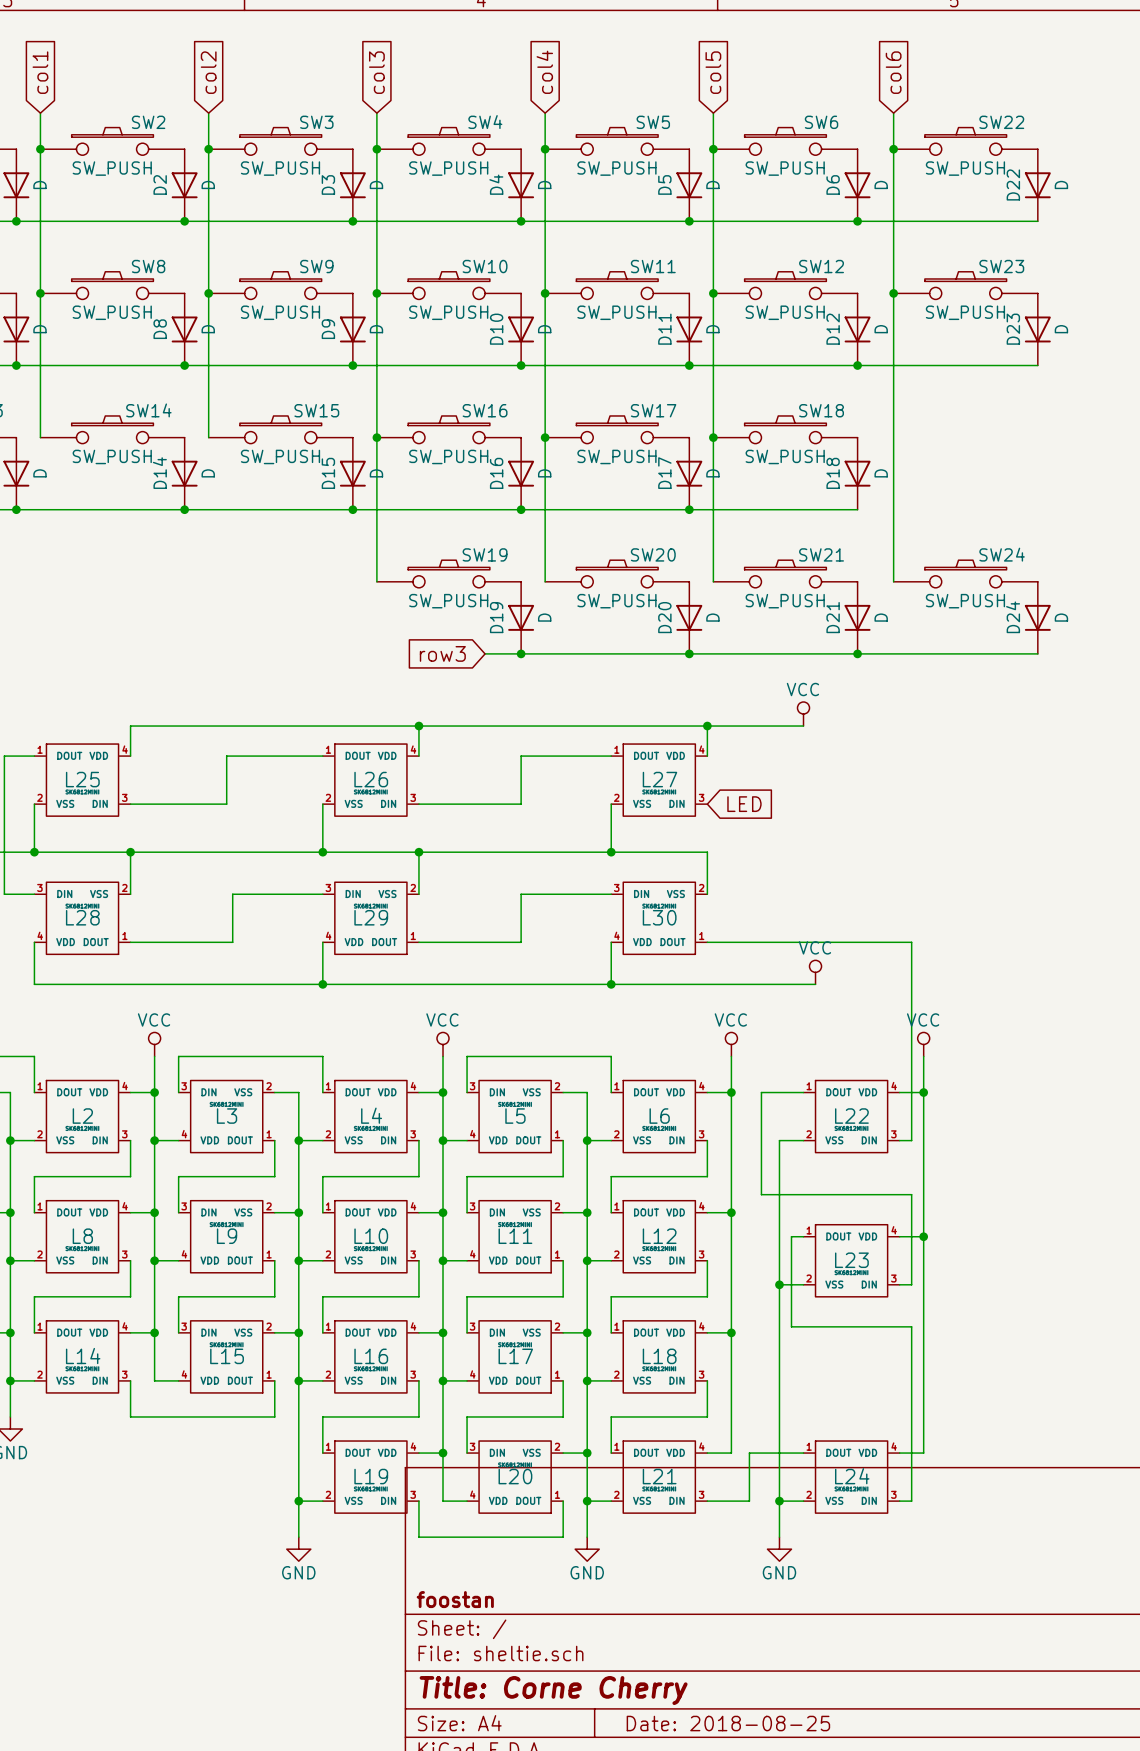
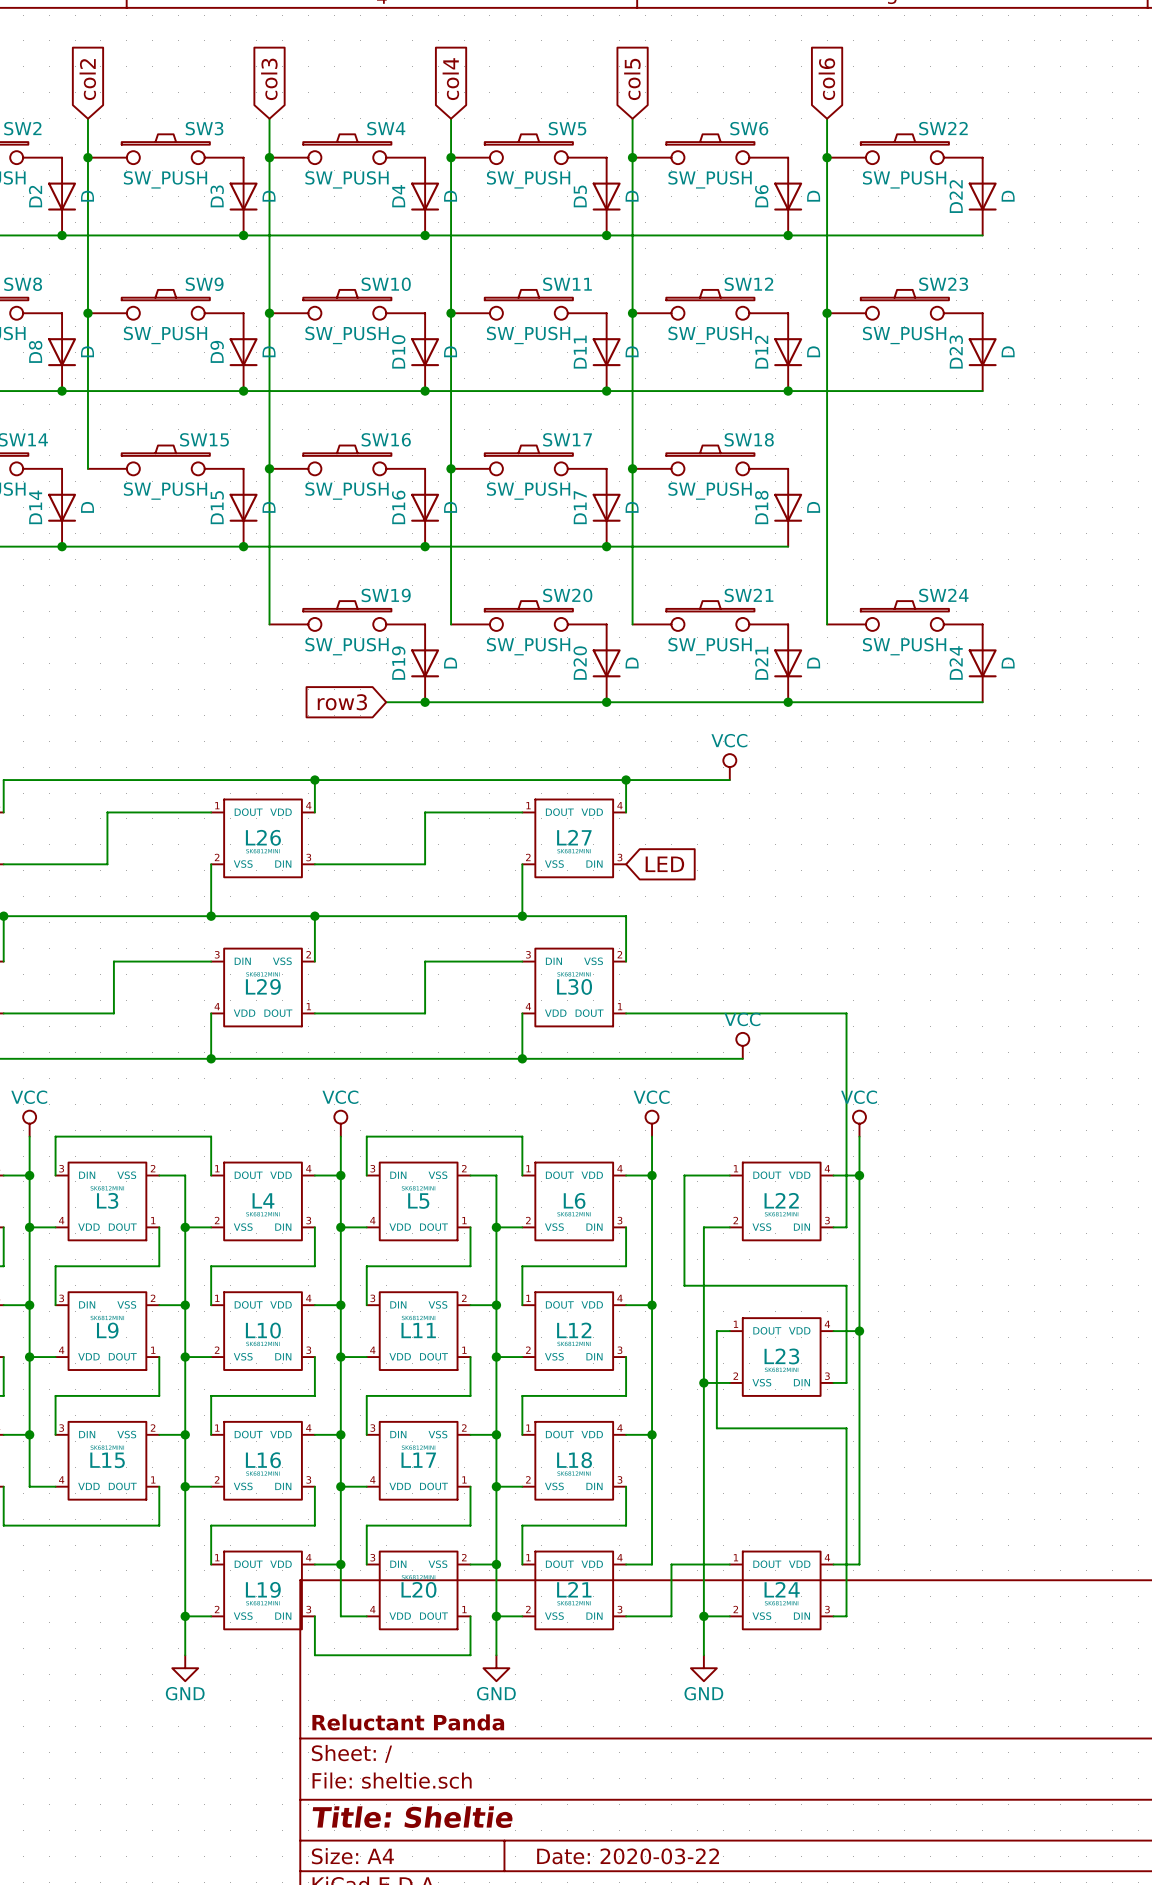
title block: foostan (455, 1599) -> Reluctant Panda (408, 1722)
title block: Title: Corne Cherry (553, 1690) -> Title: Sheltie (412, 1817)
title block: Date: 2018-08-25 (728, 1723) -> Date: 2020-03-22 (628, 1856)

